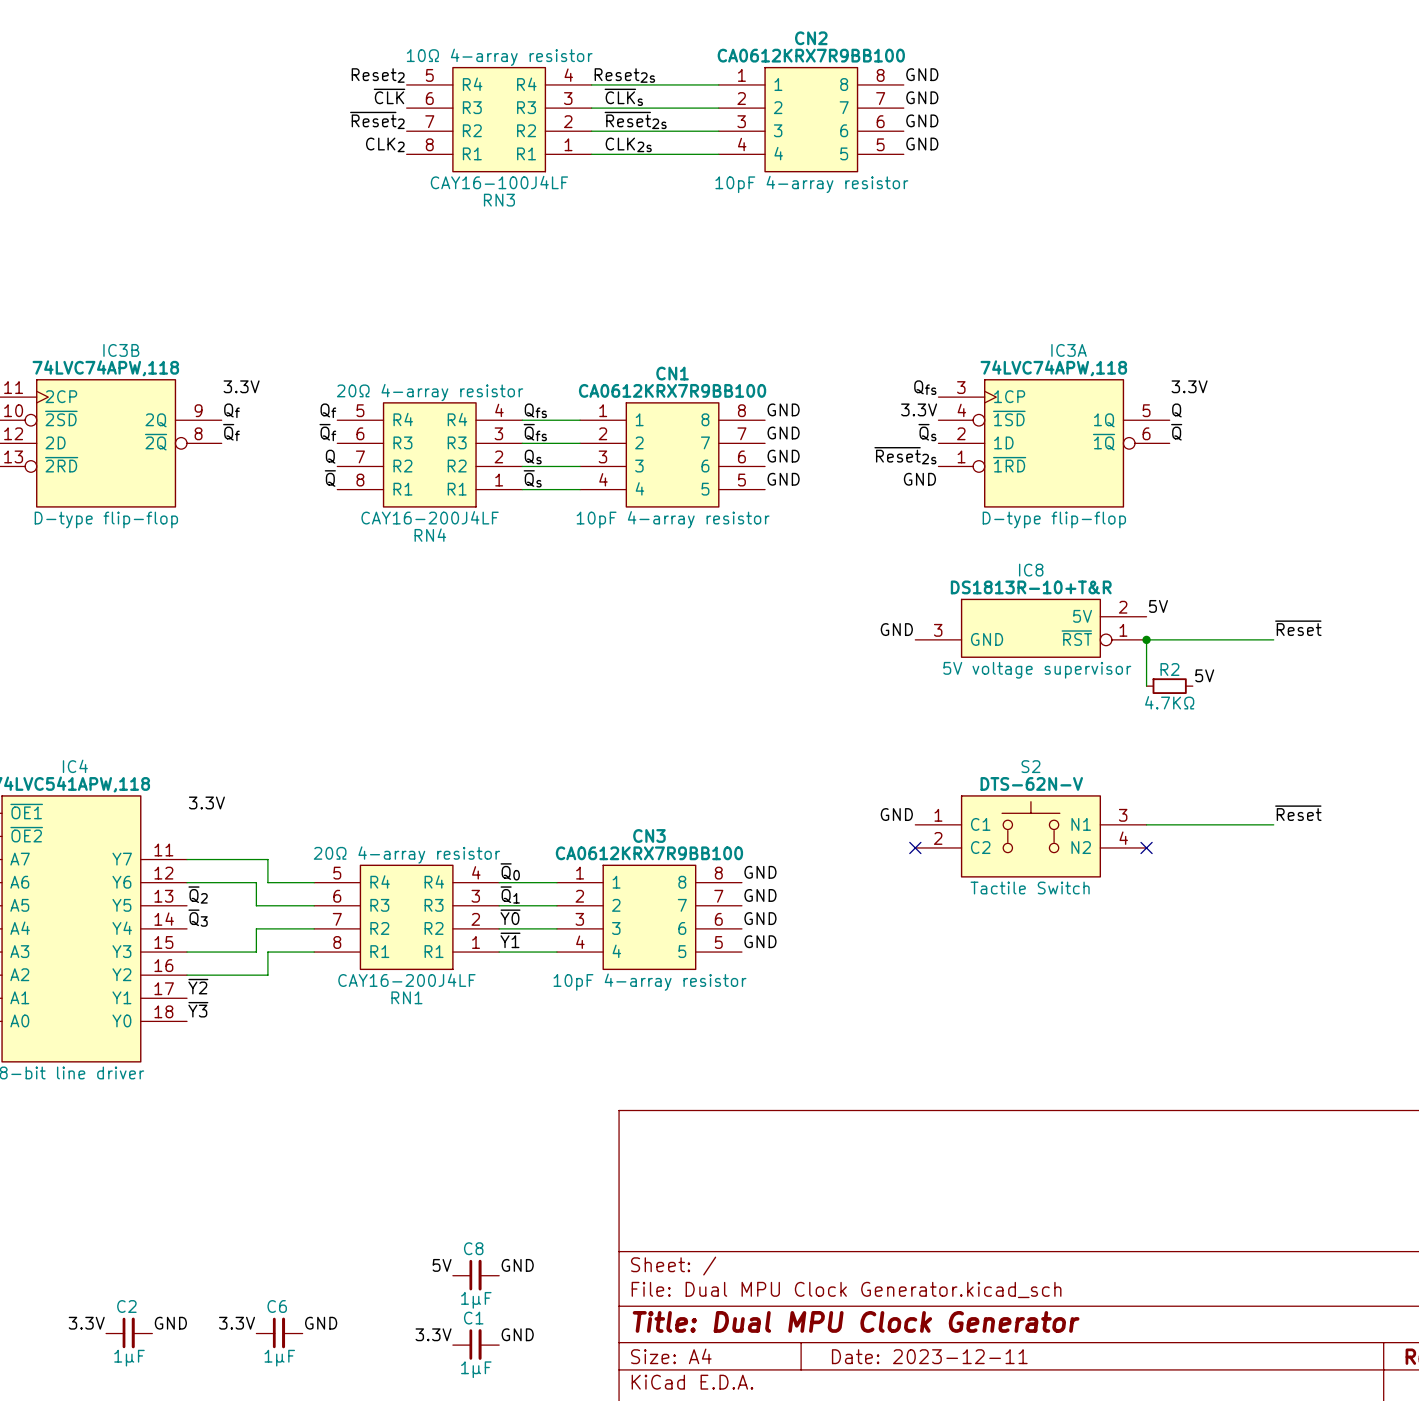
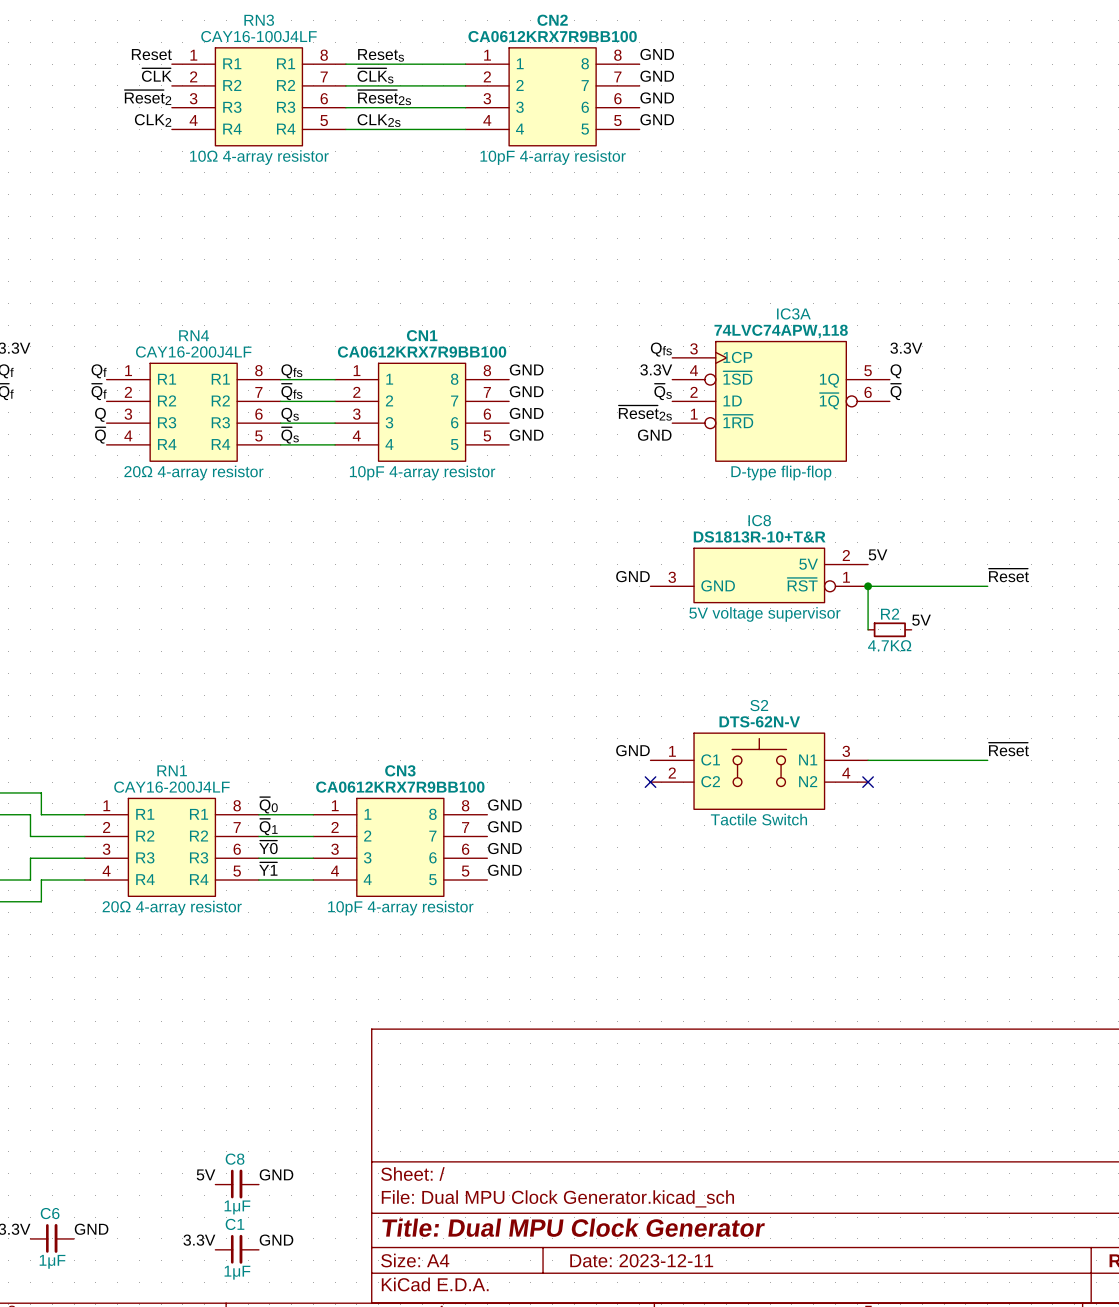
label: Reset2 (378, 75) -> Reset (151, 54)
label: Reset2s (624, 75) -> Resets (381, 55)
RN3 rotation: 0° (499, 119) -> 180° (258, 96)
RN4 rotation: 0° (429, 454) -> 180° (193, 412)
RN1 rotation: 0° (406, 917) -> 180° (171, 847)

